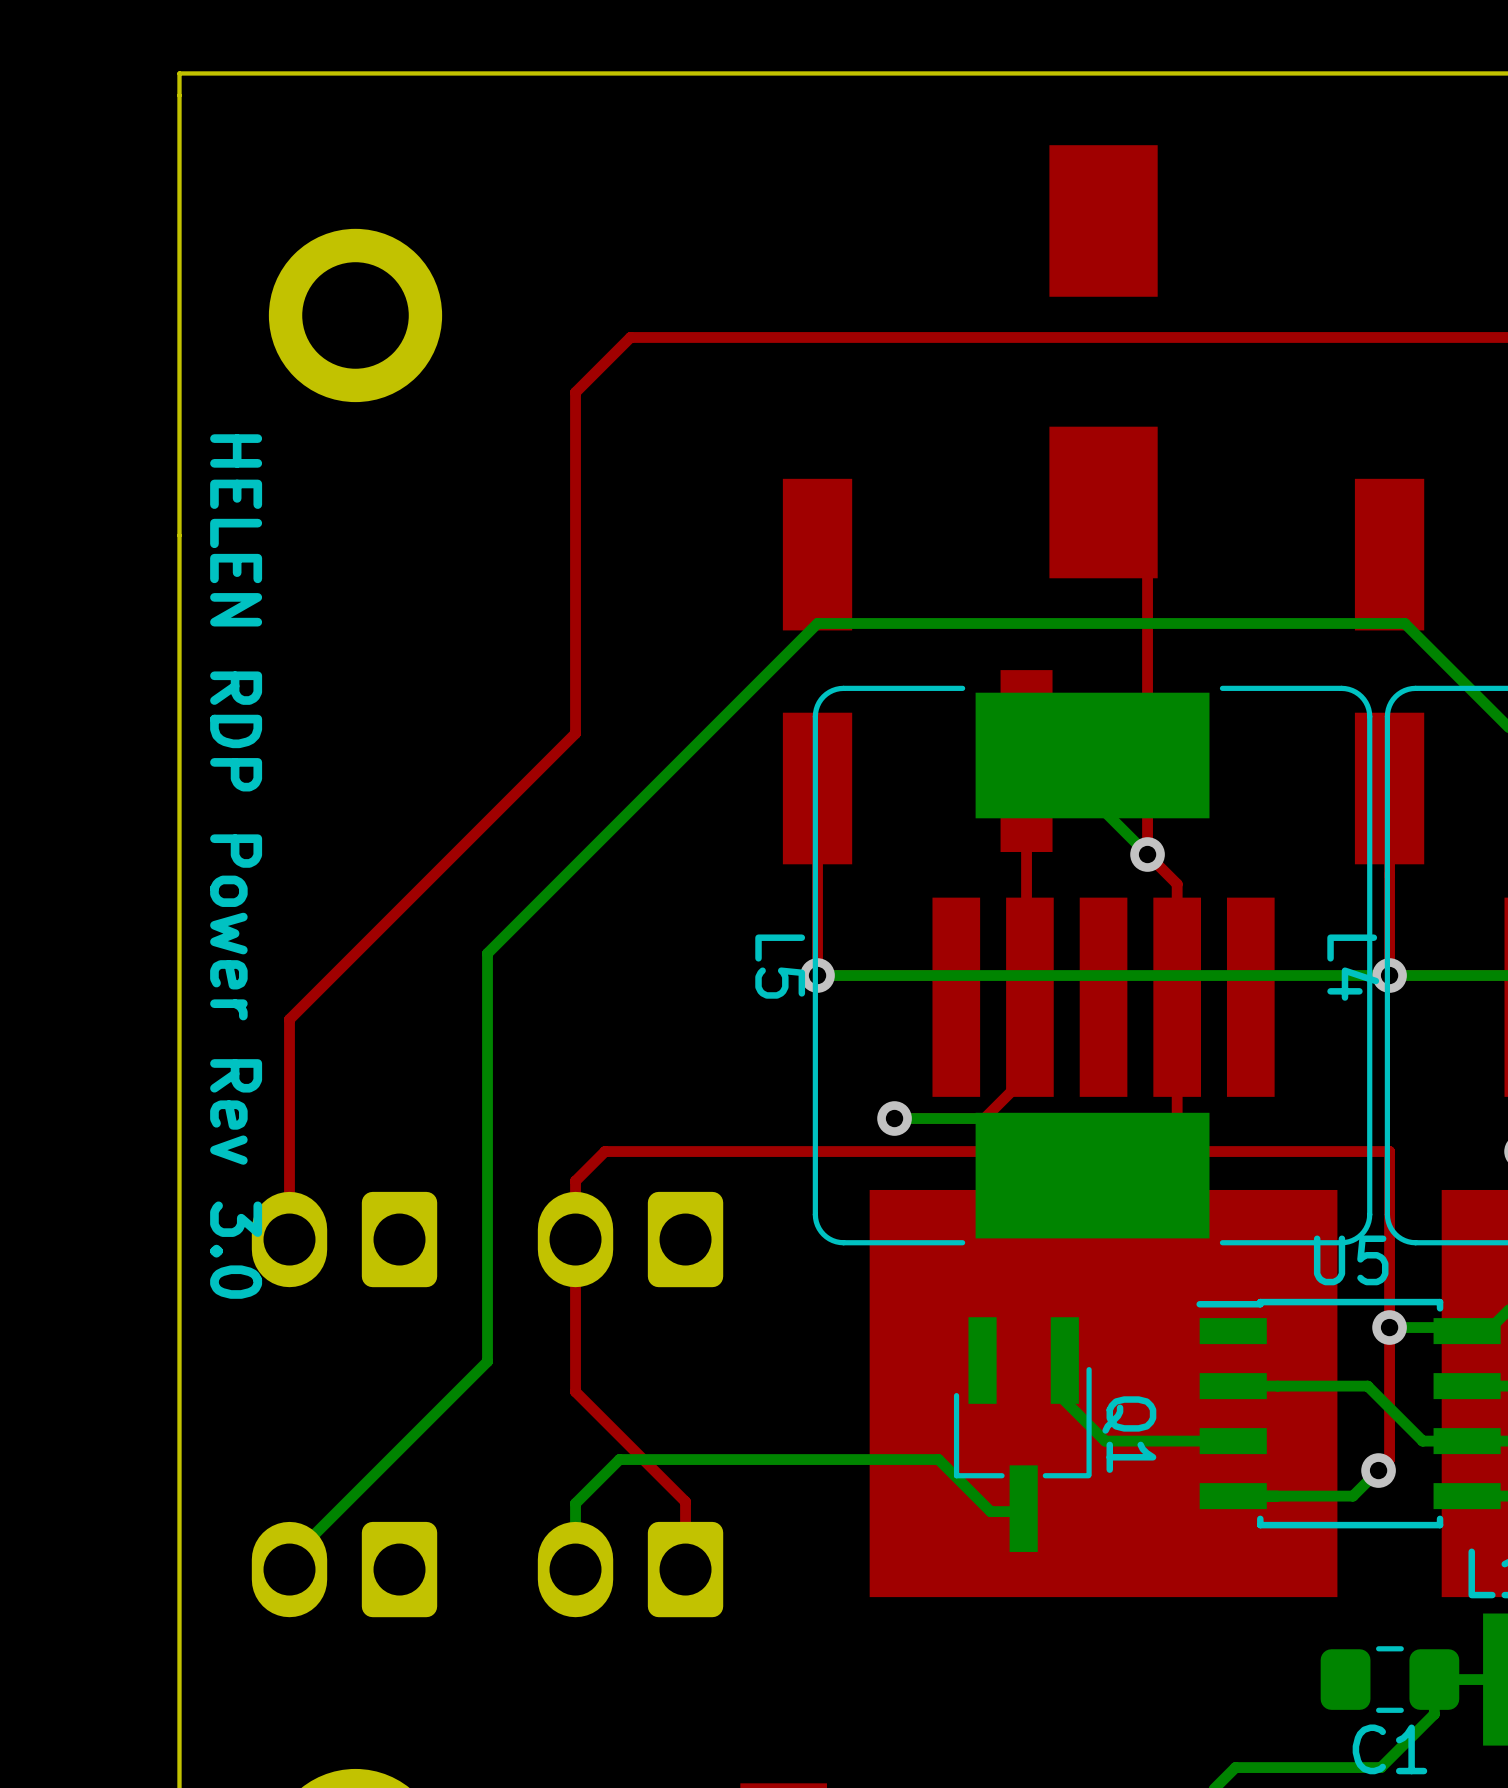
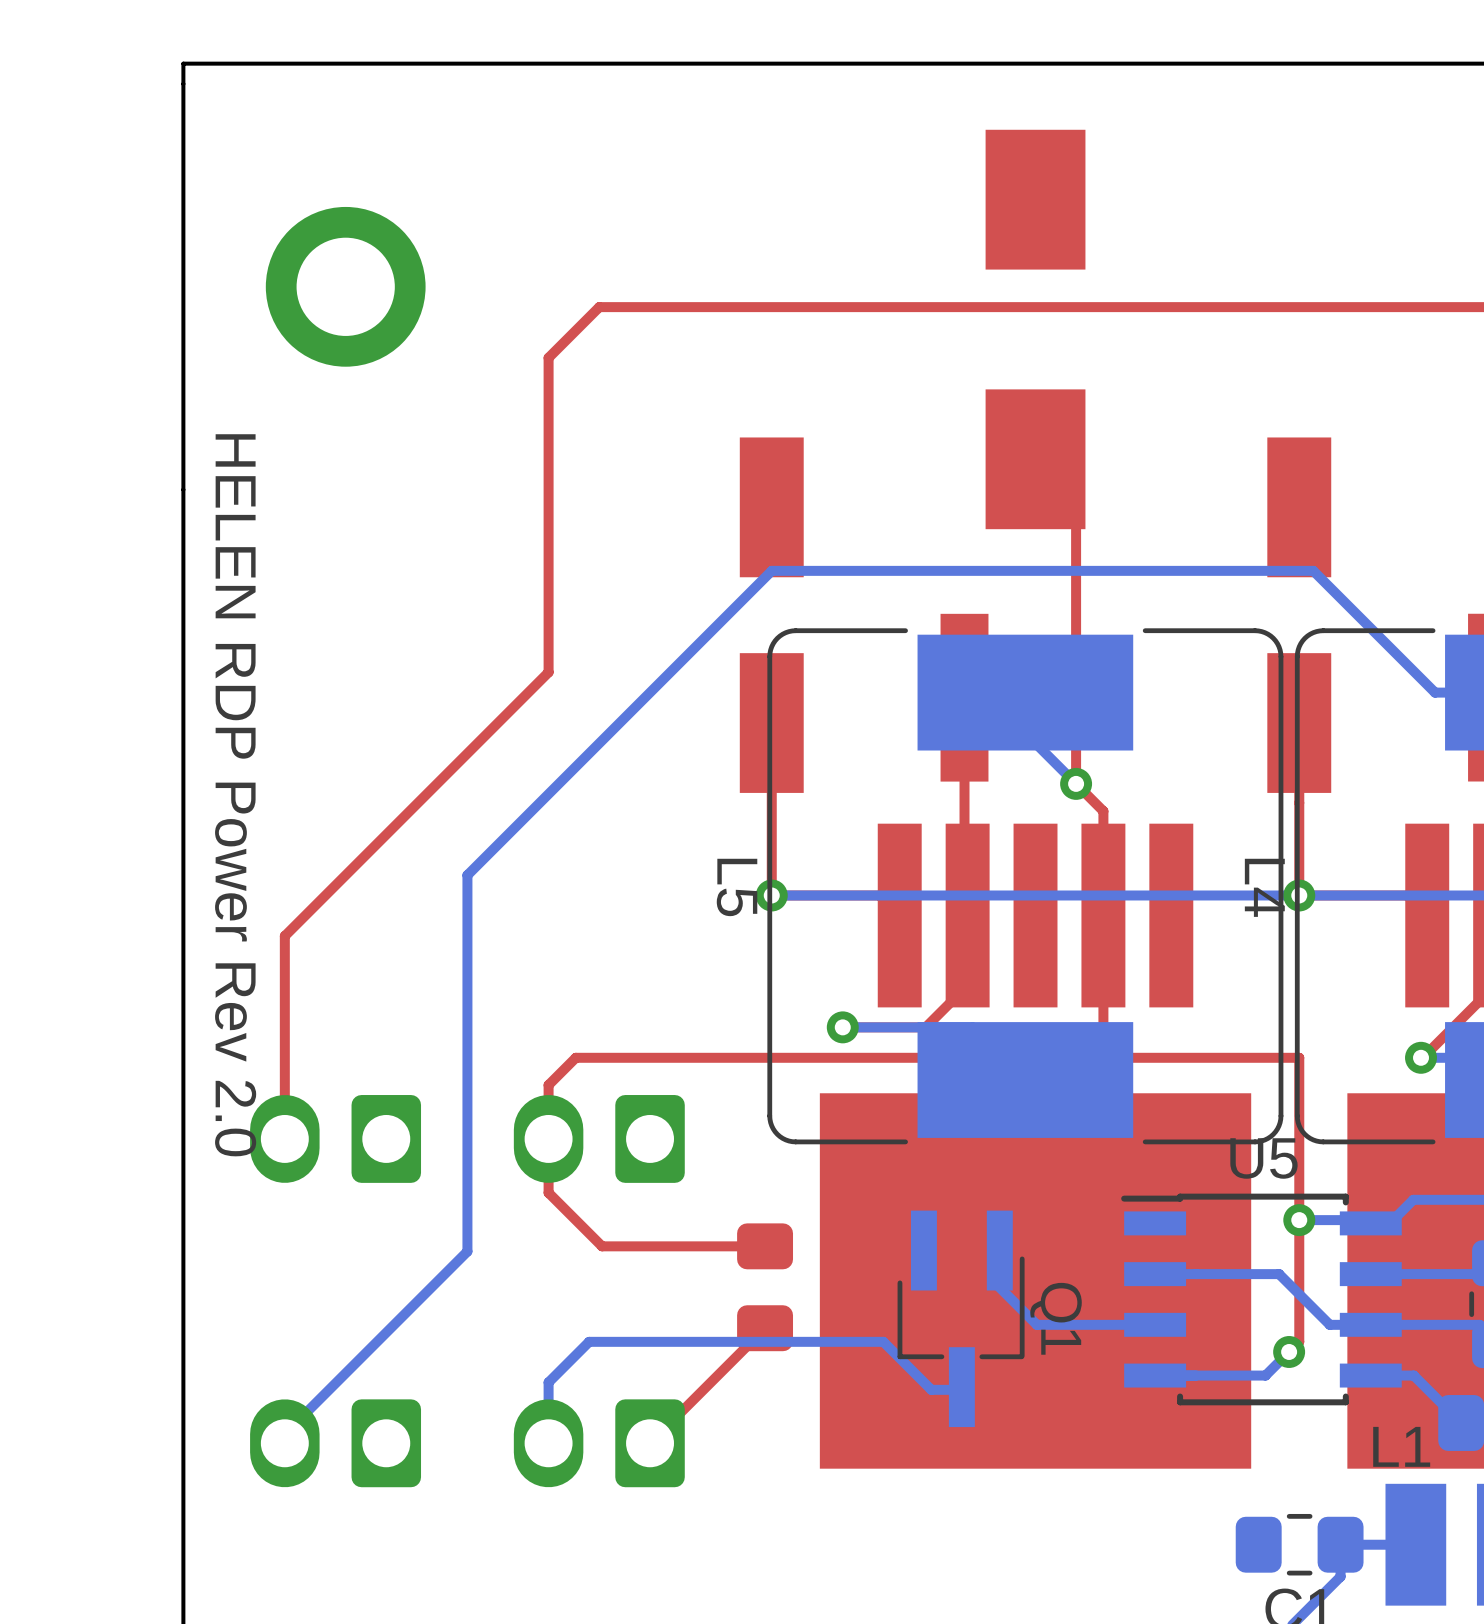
text: HELEN RDP Power Rev 3.0 (236, 866) -> HELEN RDP Power Rev 2.0 (235, 795)
top track: (575, 1297) (575, 1391) (685, 1501) (685, 1569) -> (548, 1192) (602, 1246) (765, 1246)
part: none -> (765, 1287)
top track: none -> (765, 1328) (650, 1443)

